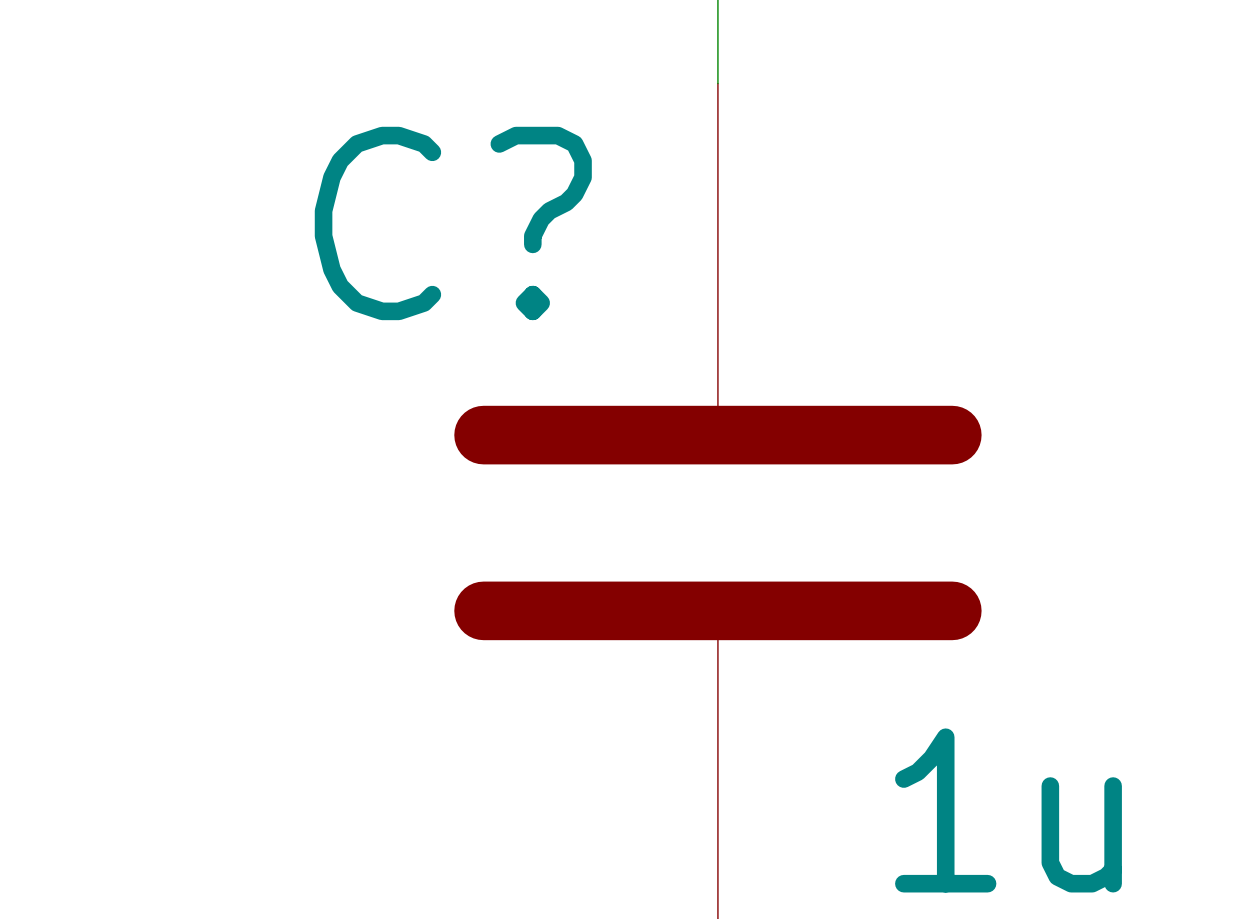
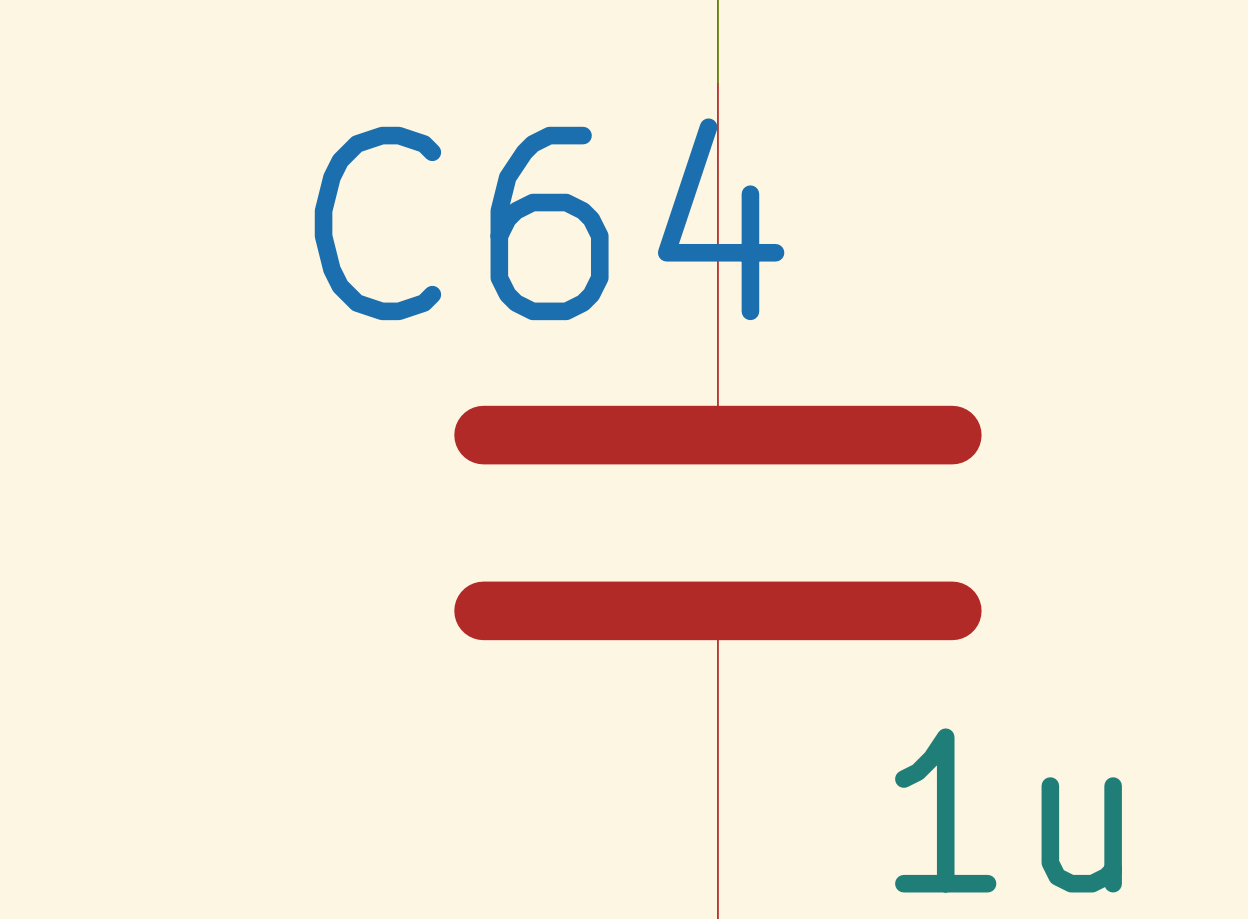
C? name: C? (453, 223) -> C64 (549, 219)

